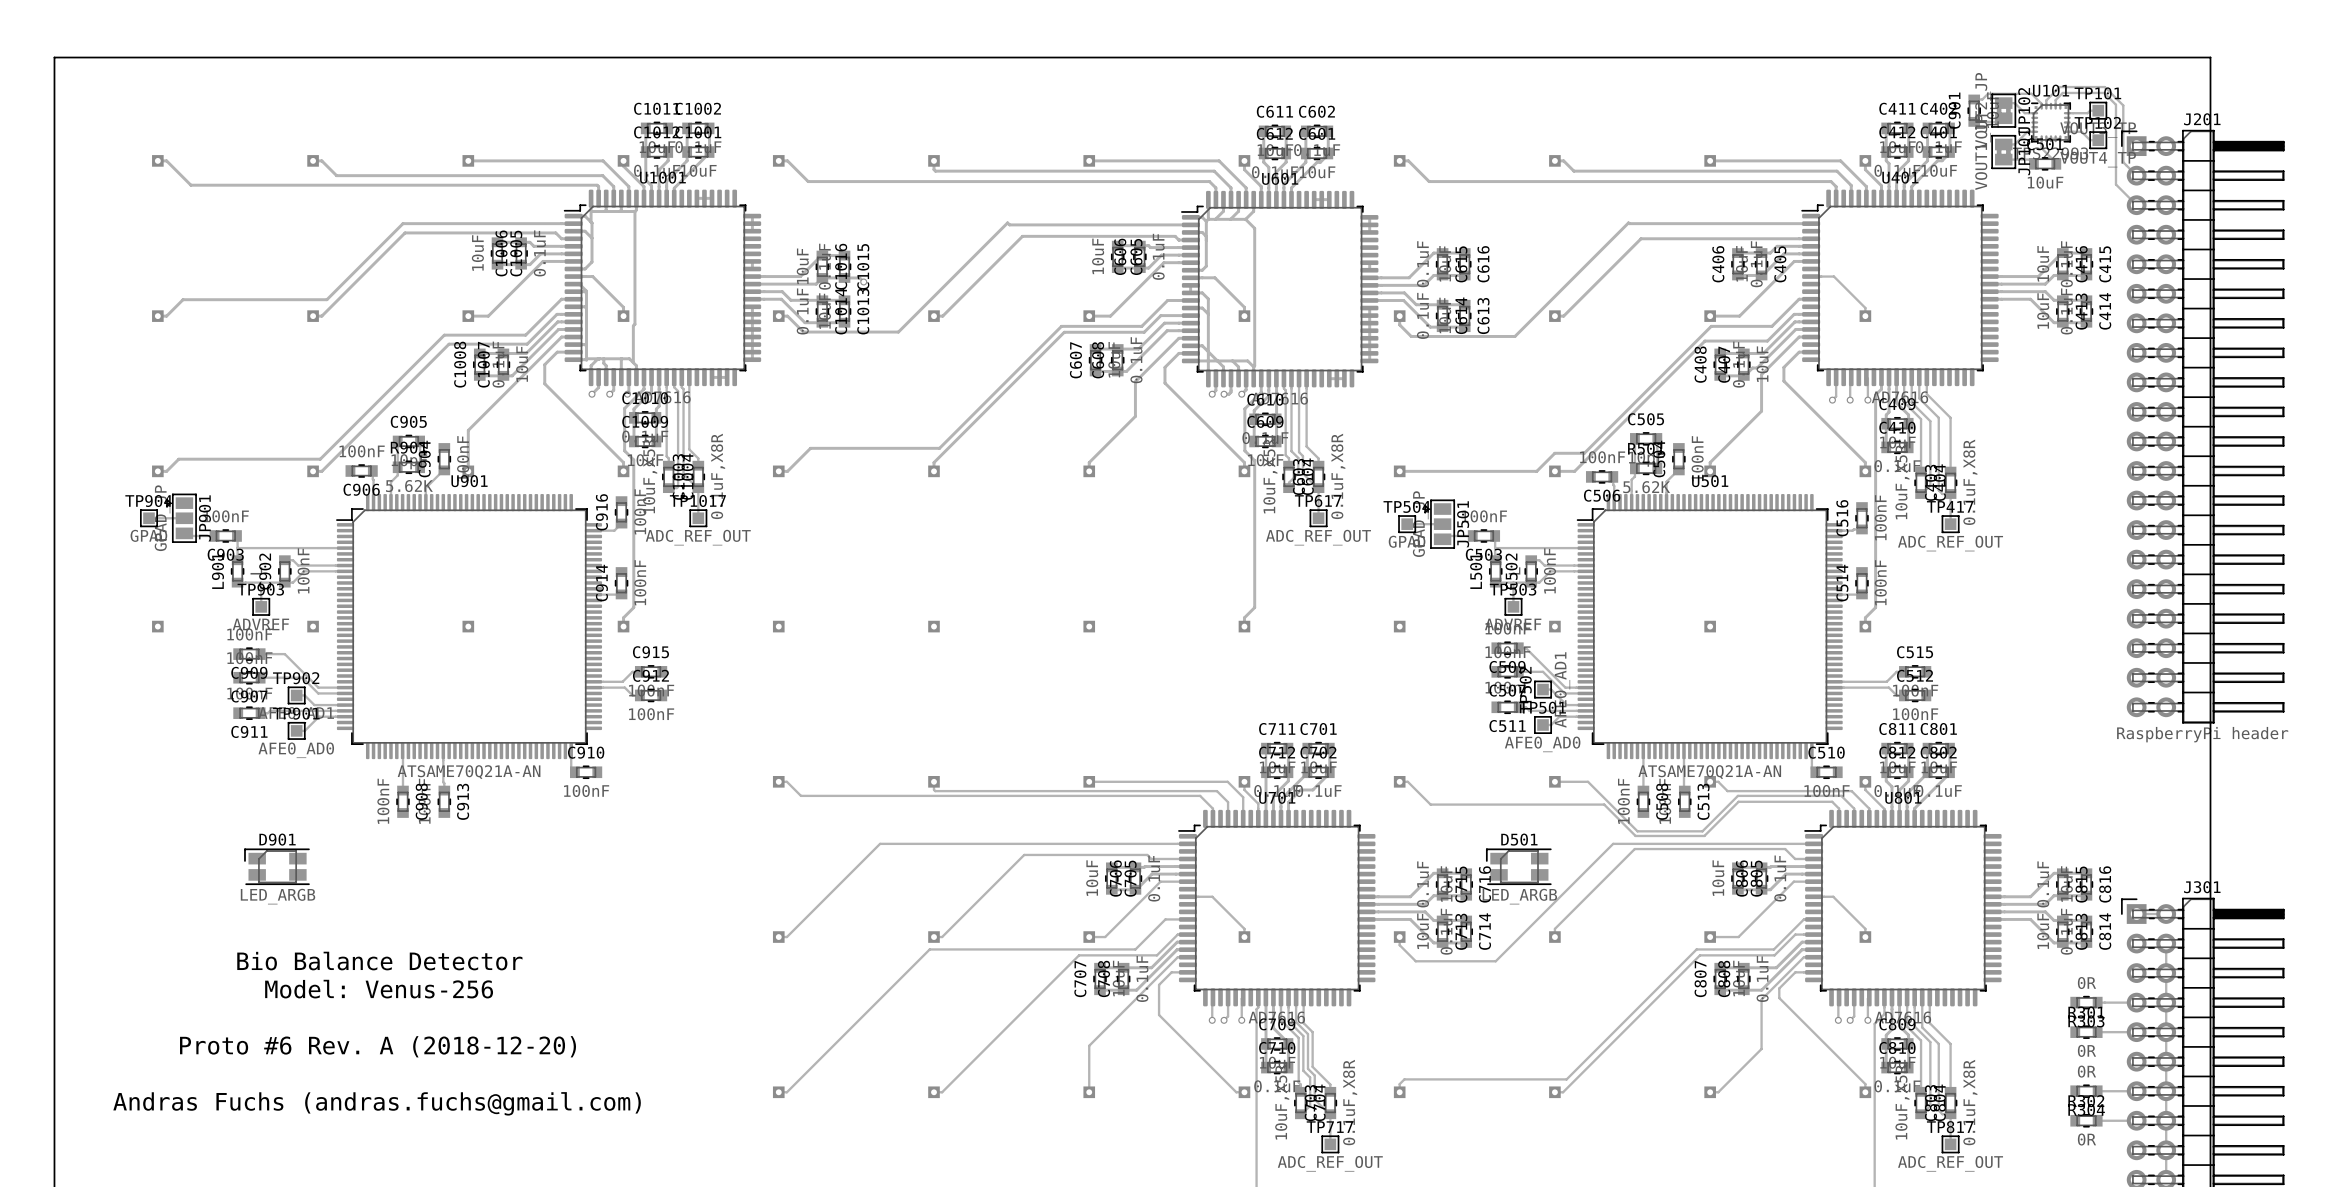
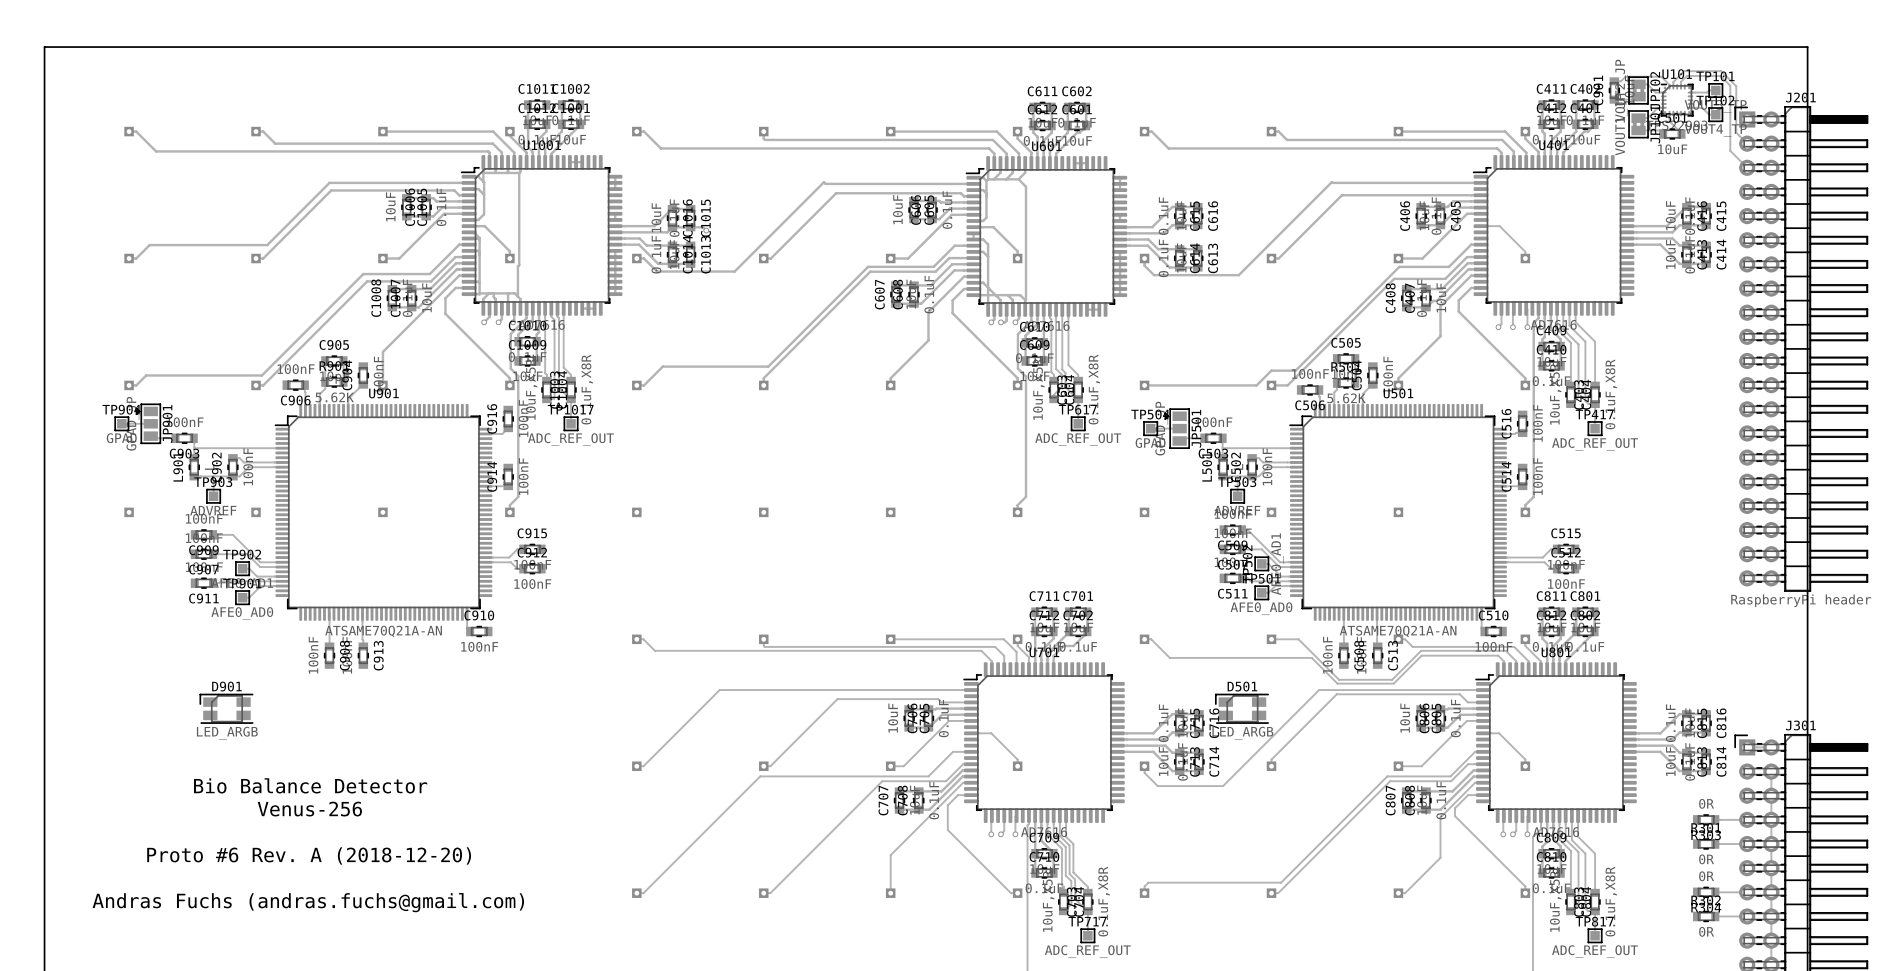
text: Model: Venus-256 (379, 989) -> Venus-256 (309, 809)

